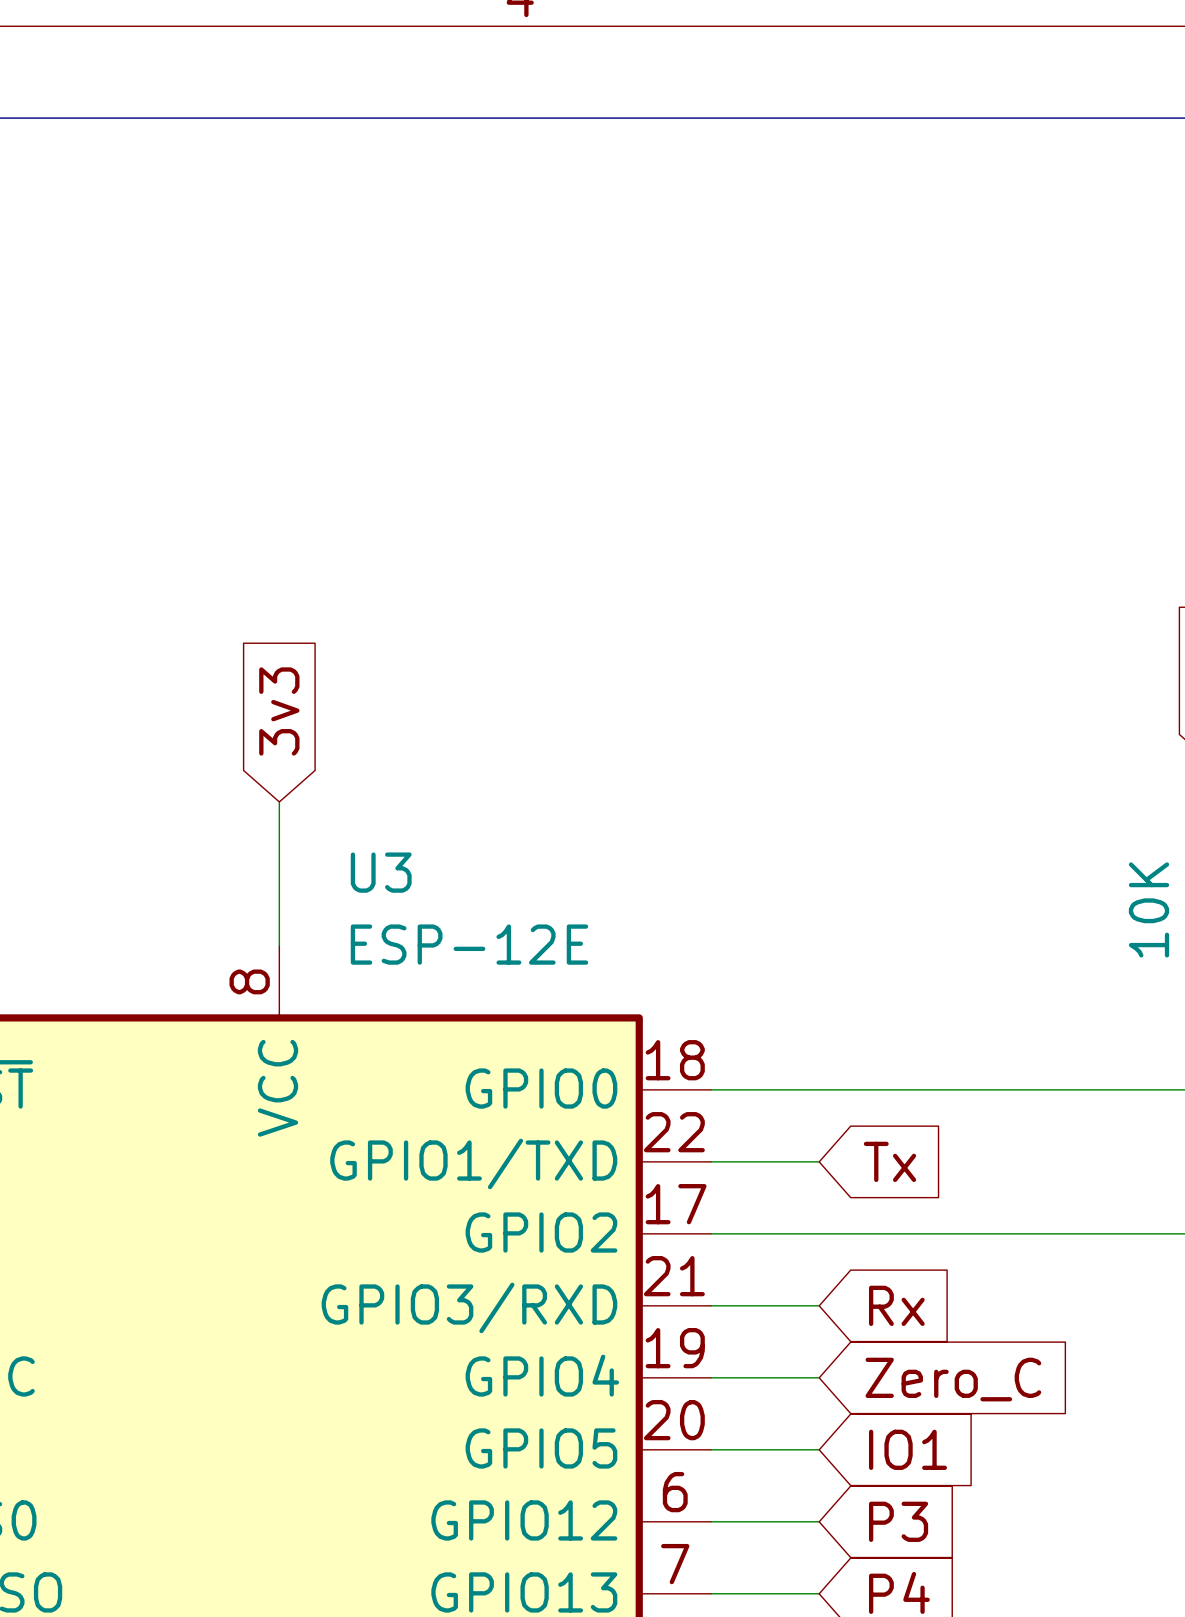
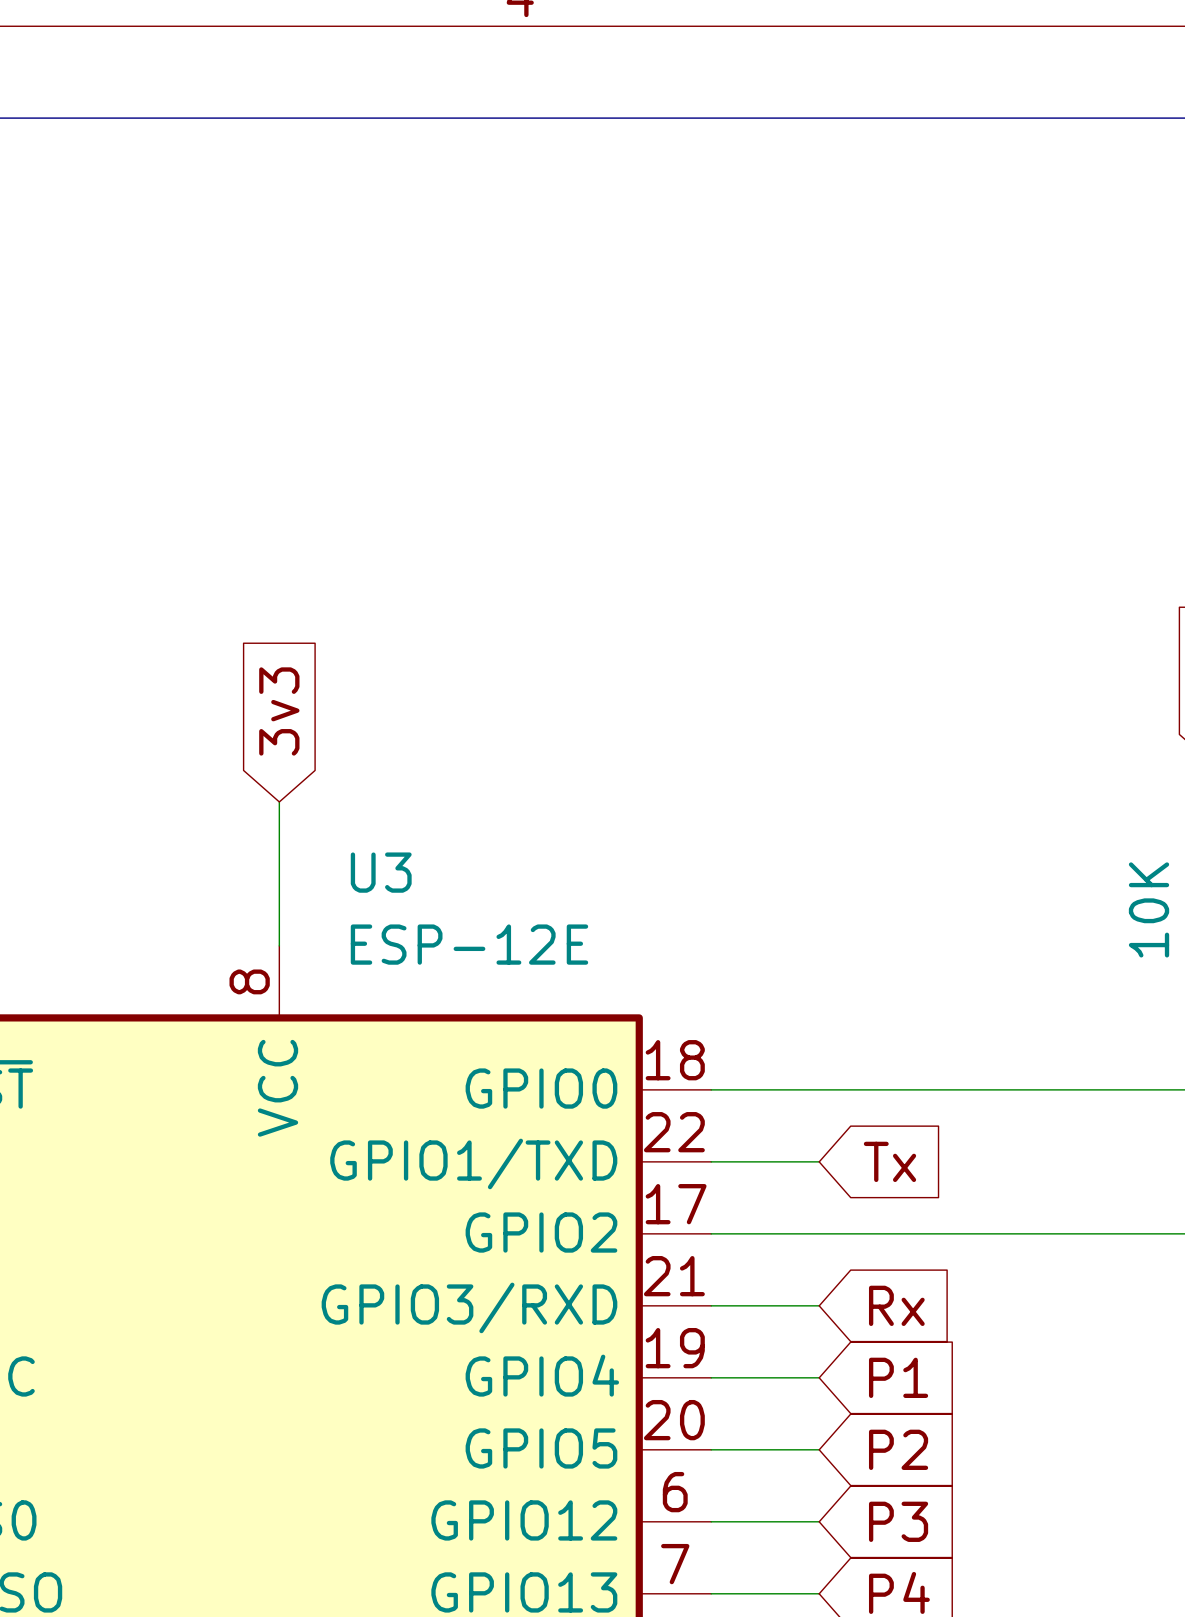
global label: Zero_C (953, 1379) -> P1 (898, 1377)
global label: IO1 (907, 1449) -> P2 (898, 1449)

